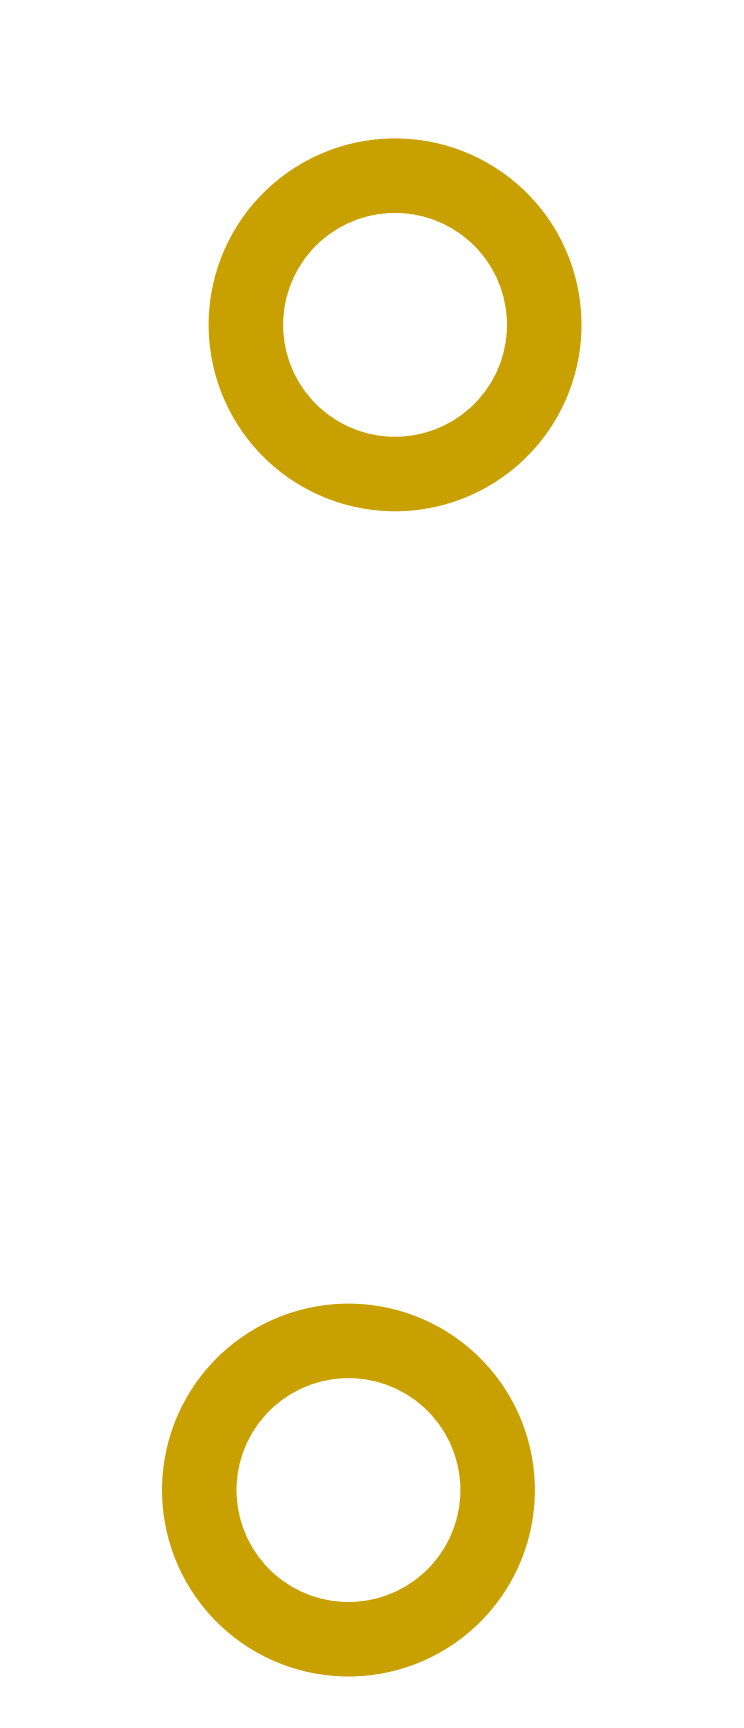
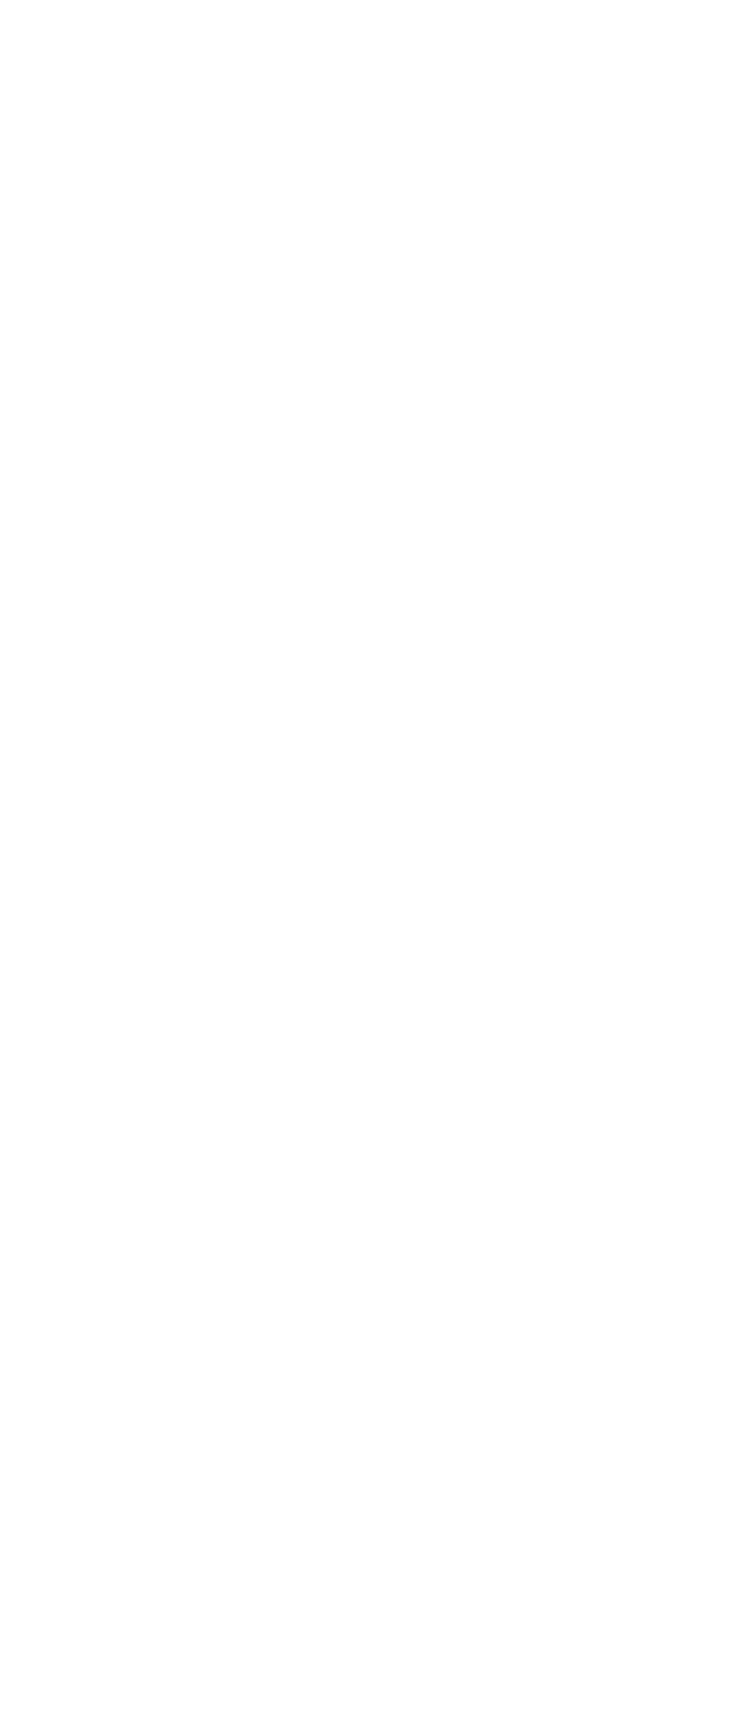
part: (395, 324) -> none
part: (348, 1490) -> none

